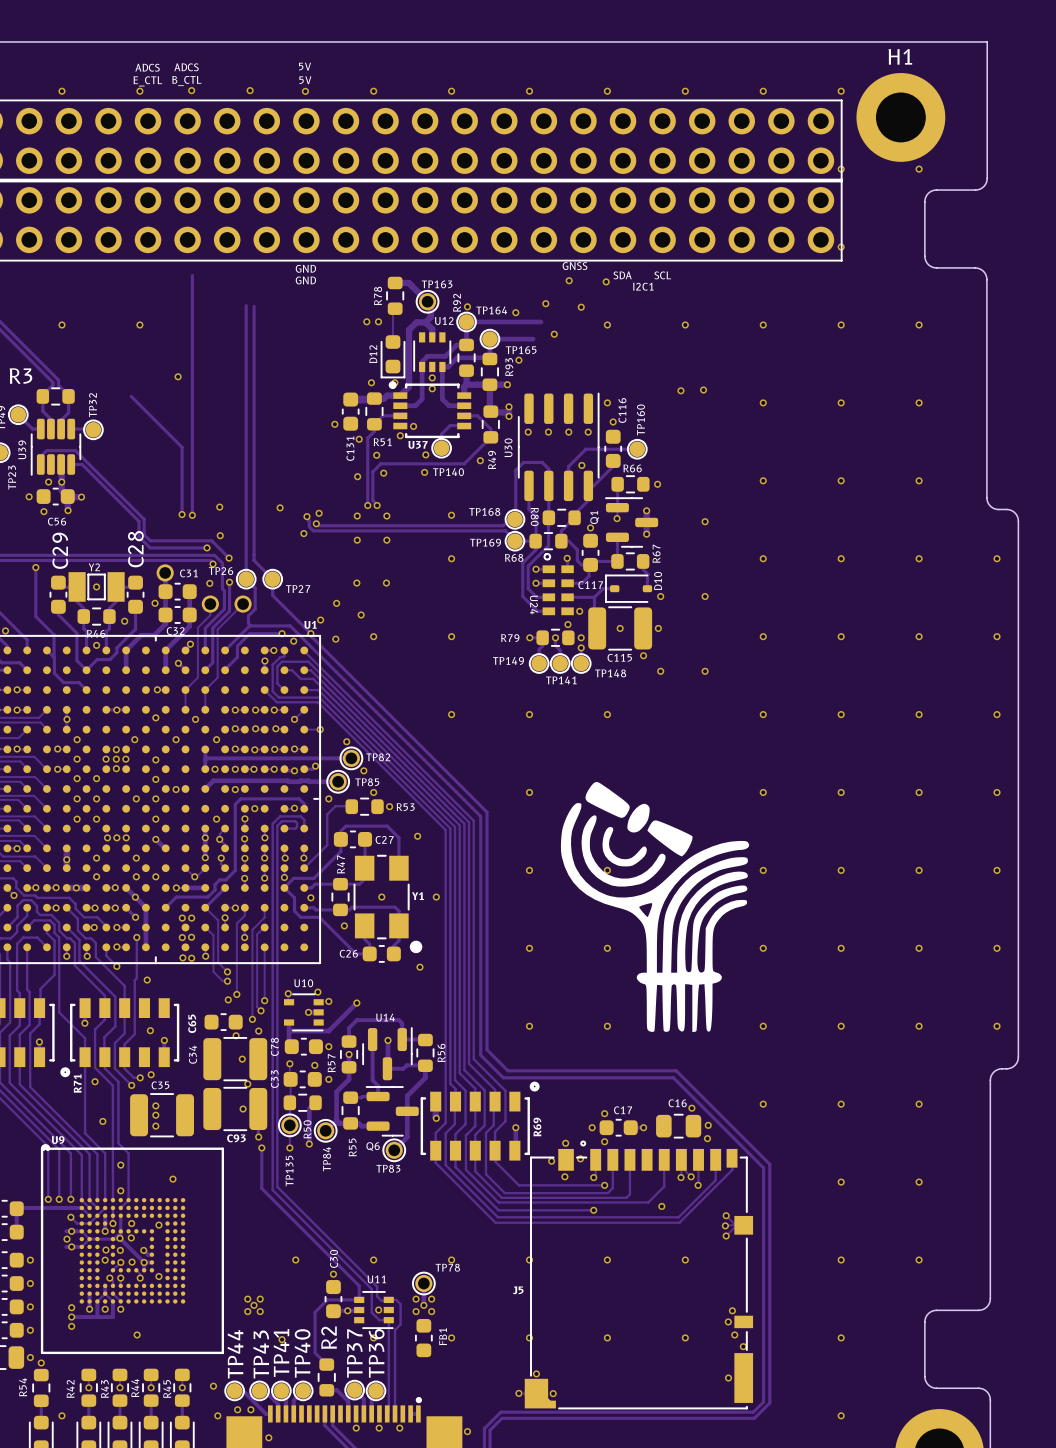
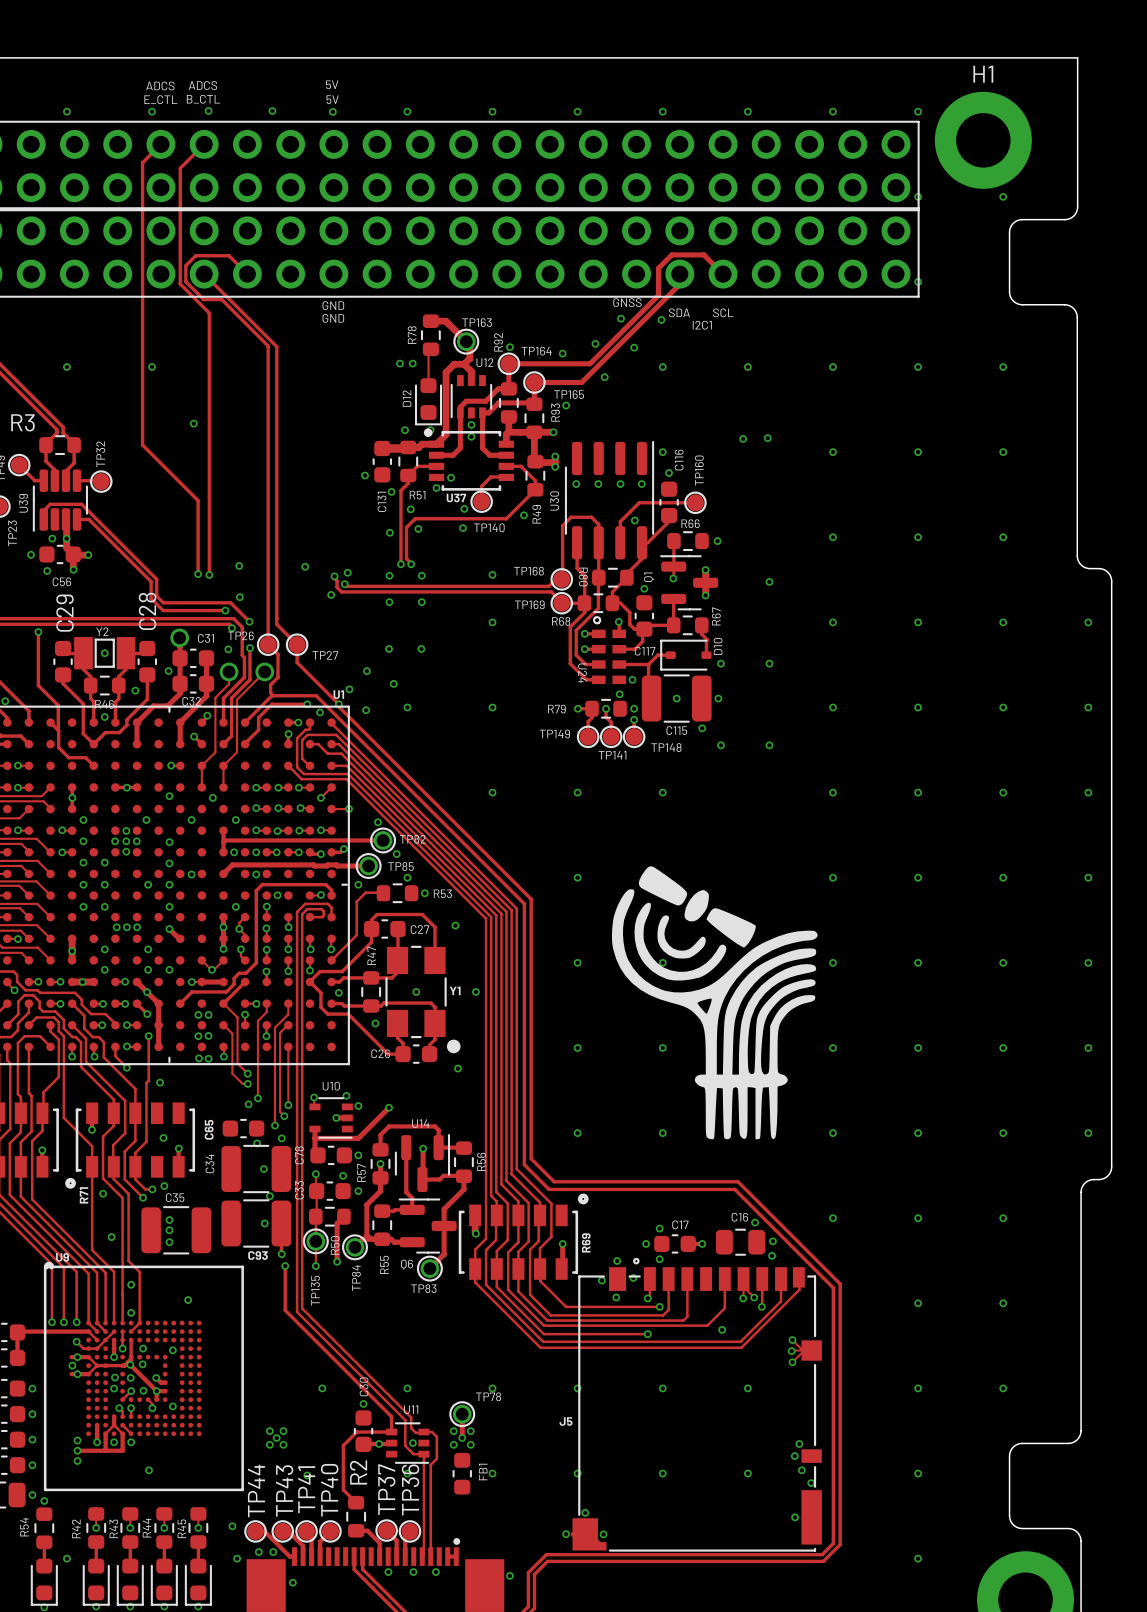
track: none -> (160, 144) (142, 162) (142, 445)
track: none -> (204, 144) (180, 168) (180, 284) (209, 313)
track: none -> (204, 274) (276, 346)
track: none -> (247, 274) (229, 255) (195, 255) (185, 265) (185, 281) (203, 299) (221, 299) (268, 345)
track: none -> (723, 274) (703, 254) (671, 254) (658, 268) (658, 295) (590, 363)
track: none -> (679, 284) (581, 382)

